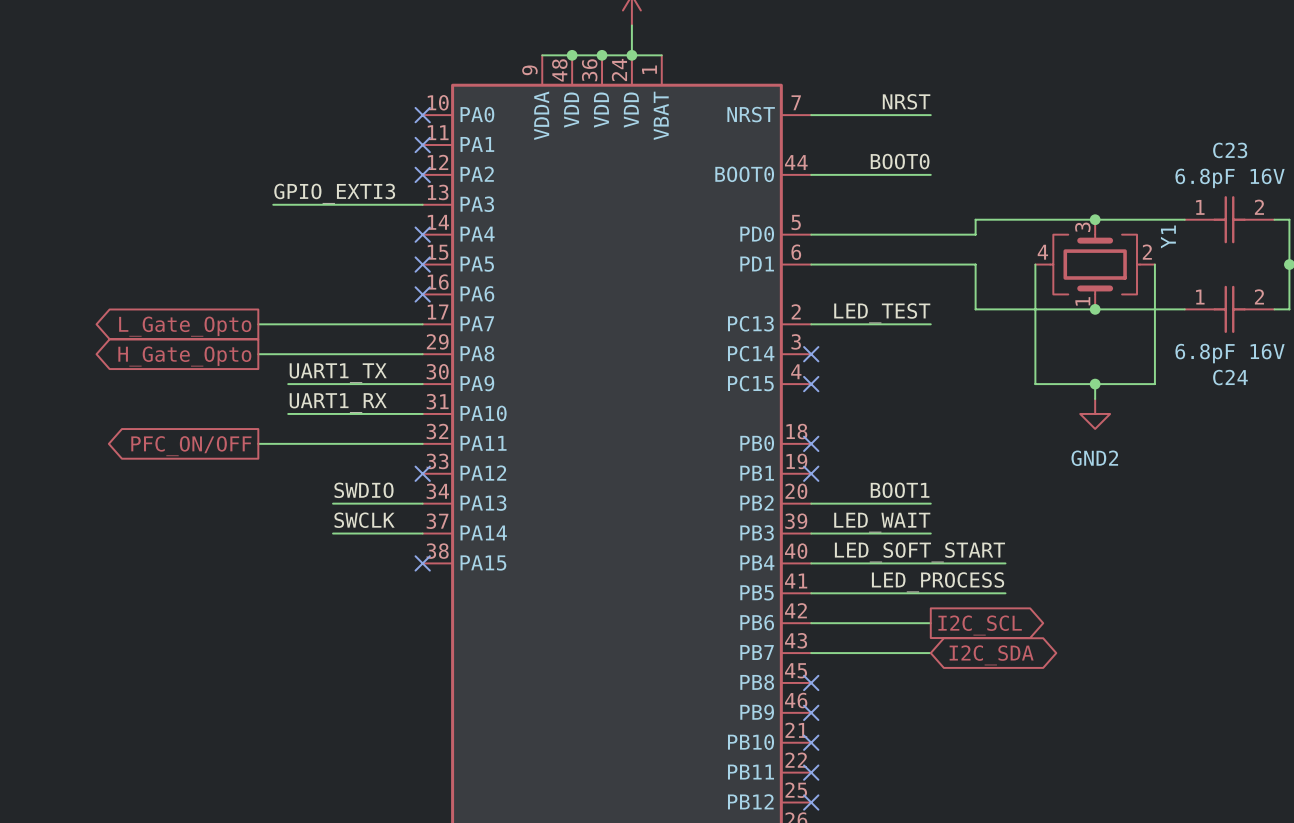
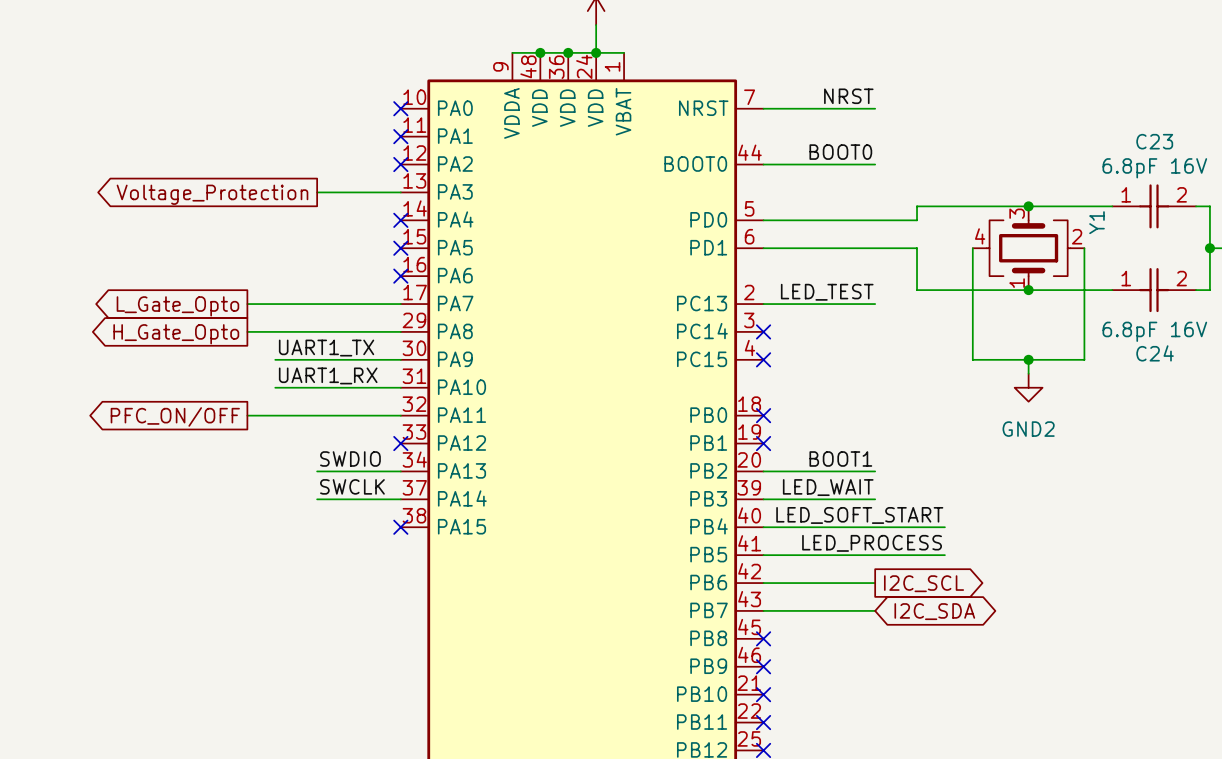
label: GPIO_EXTI3 (334, 193) -> none
wire: (273, 204) (333, 204) -> none
global label: none -> Voltage_Protection (212, 194)

